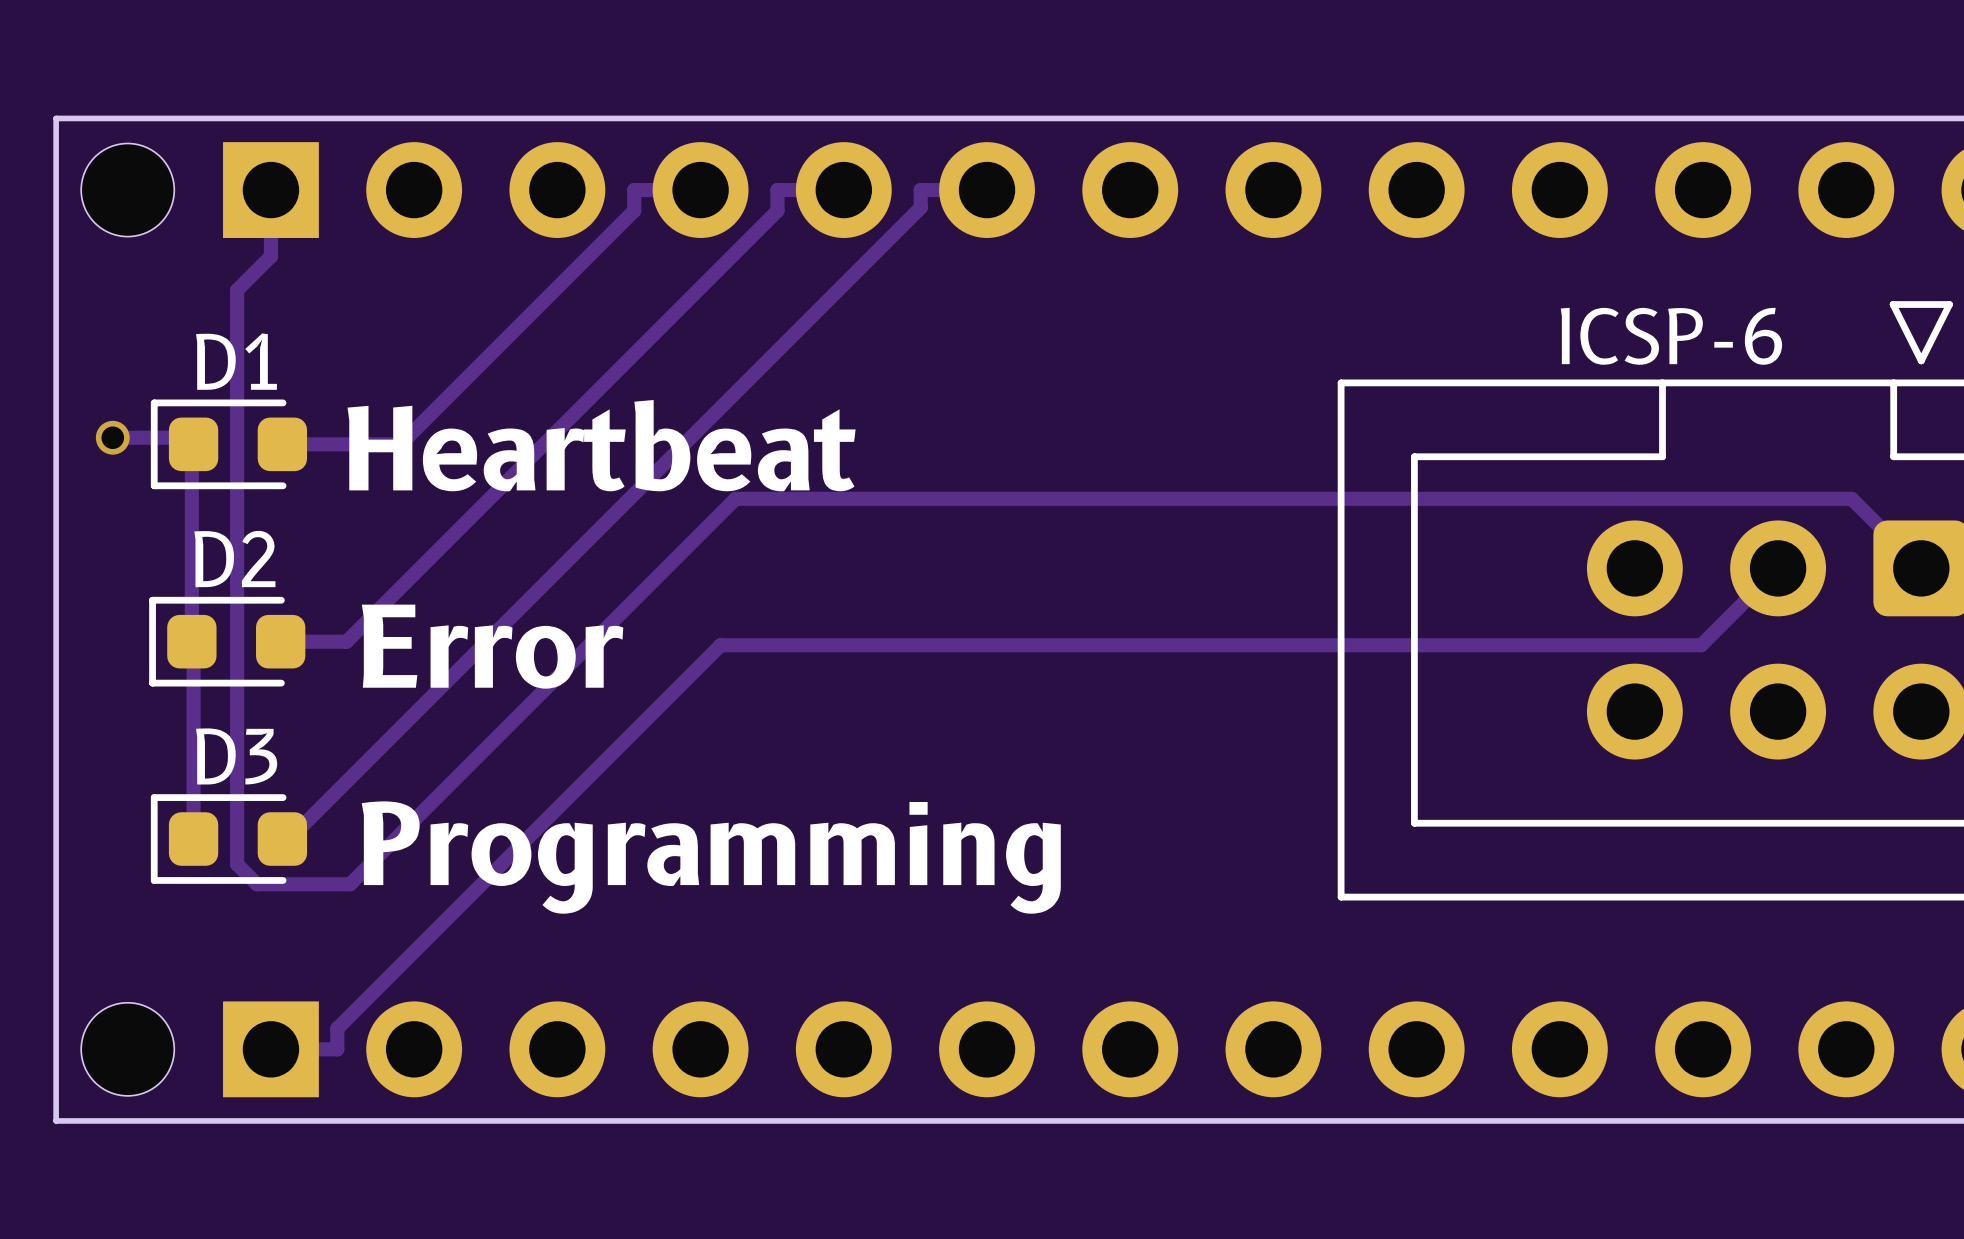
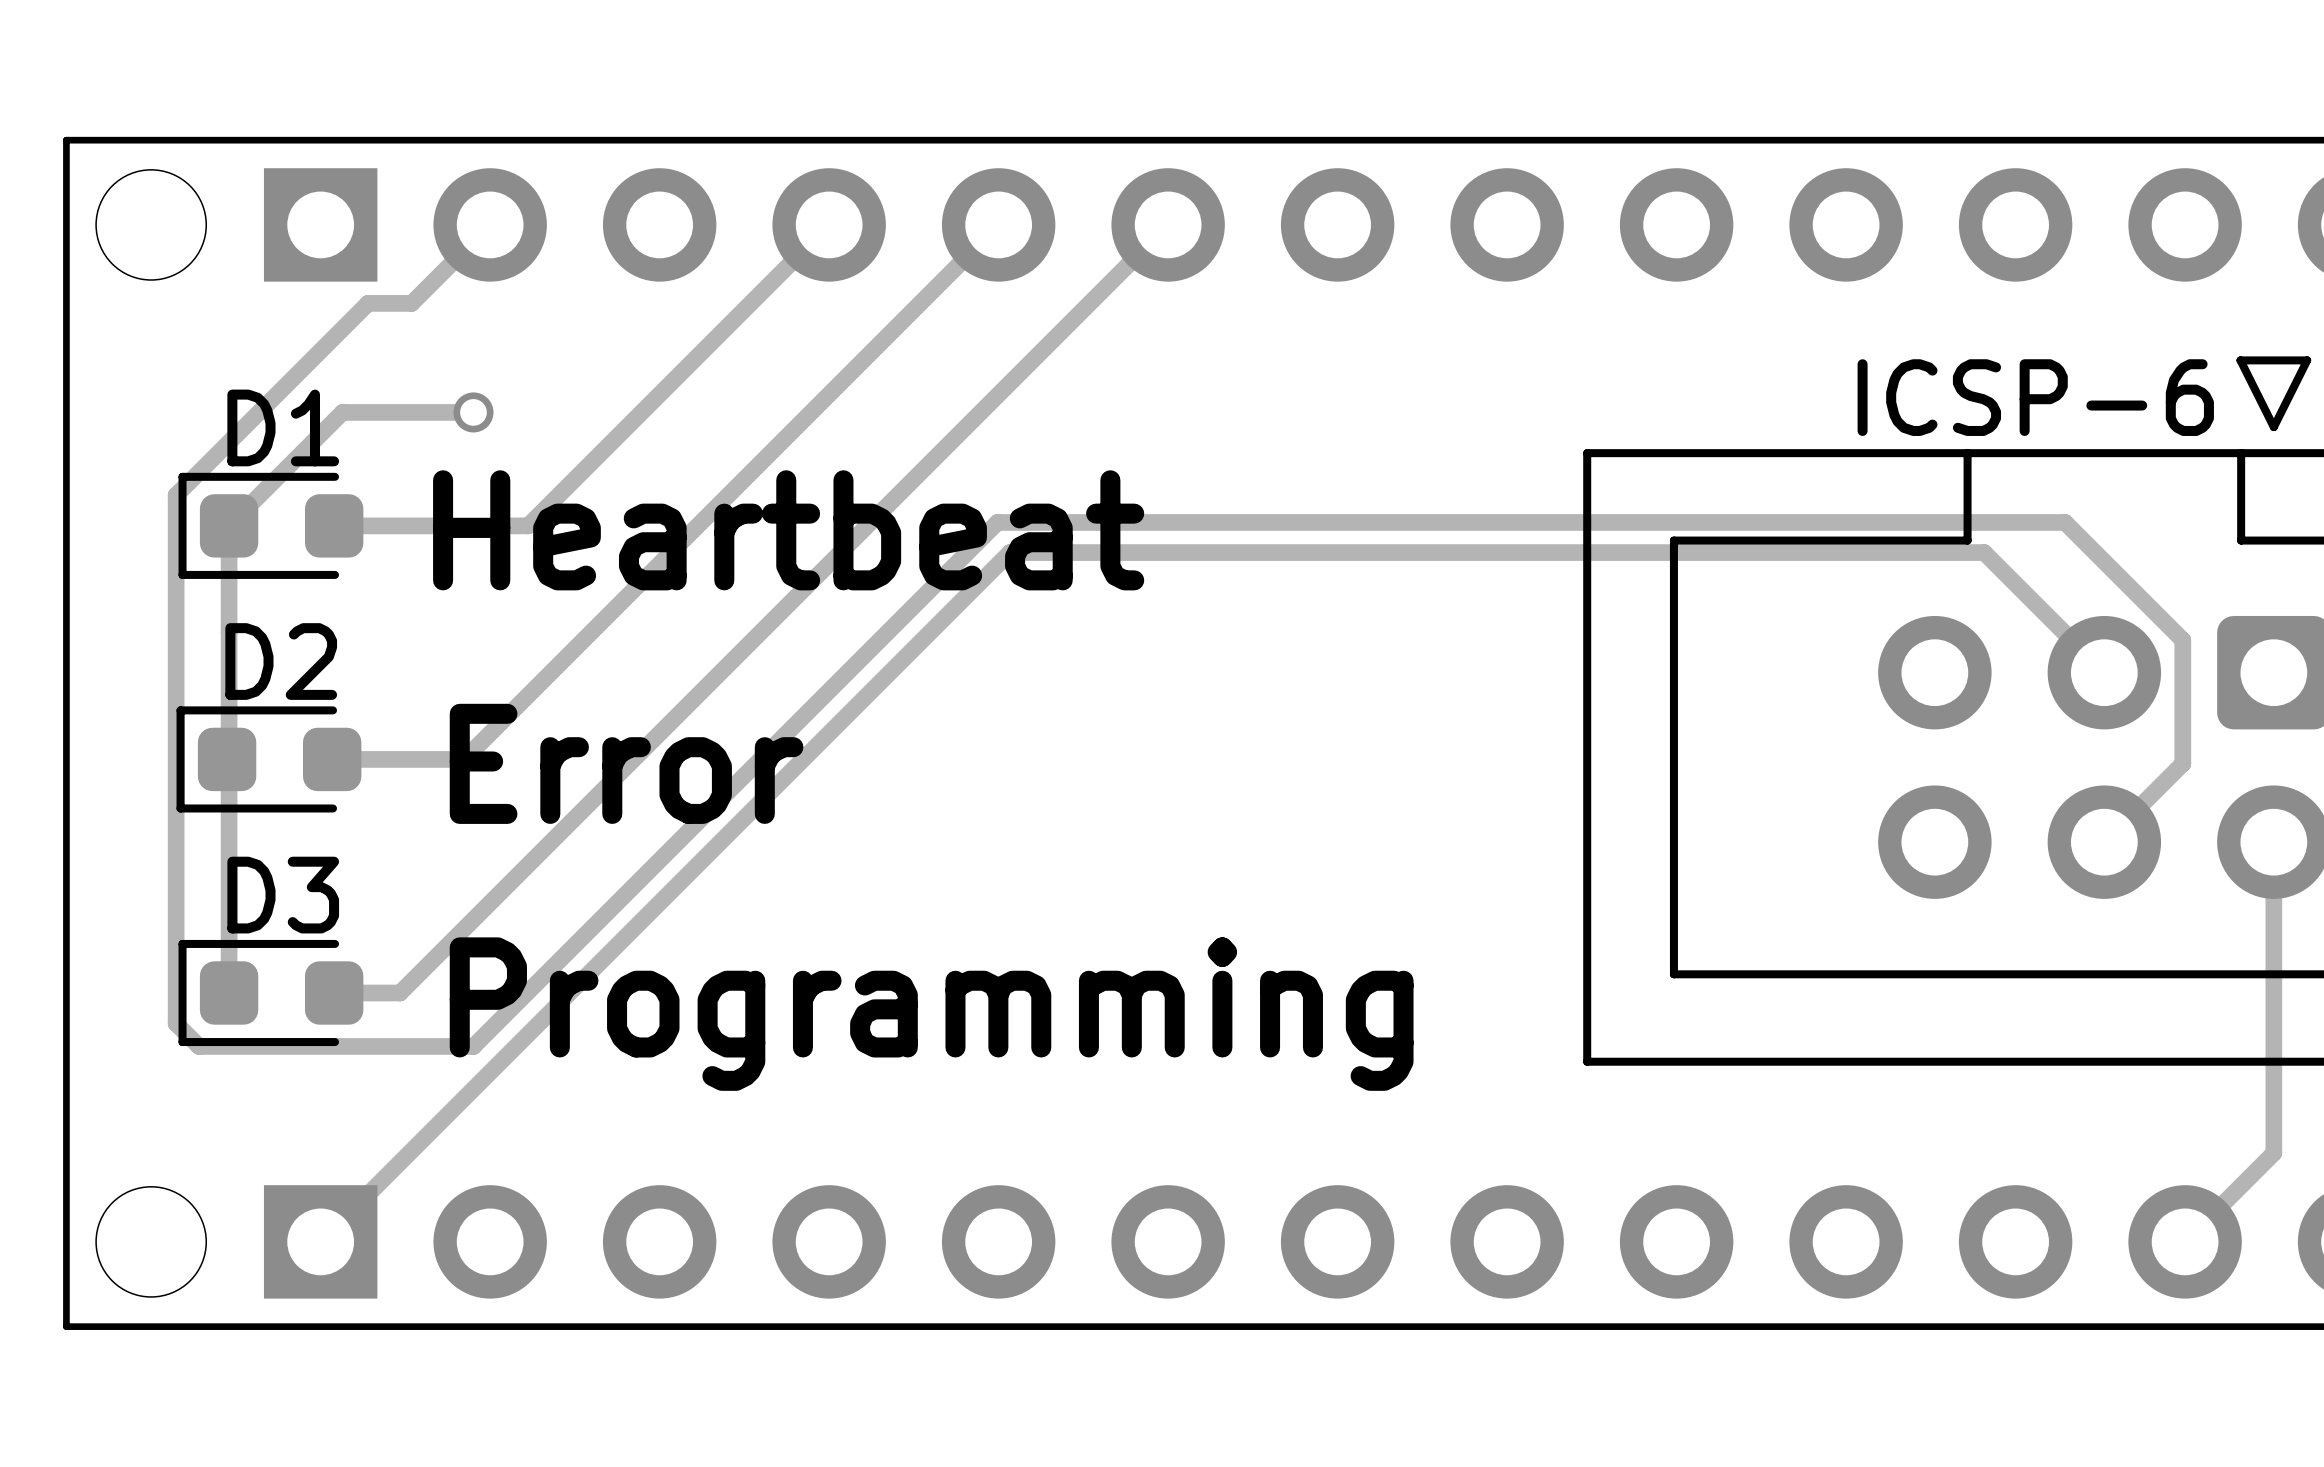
track: (270, 190) (270, 256) (237, 290) (237, 864) (257, 884) -> (490, 224) (411, 303) (368, 303) (176, 495) (176, 1023) (199, 1046) (304, 1046)
track: (700, 190) (634, 190) (634, 210) (400, 444) -> (829, 224) (528, 525) (474, 525)
track: (843, 190) (777, 190) (777, 210) (346, 641) -> (998, 224) (464, 759) (410, 759)
track: (987, 190) (920, 190) (920, 207) (289, 839) -> (1168, 224) (400, 992) (342, 992)
track: (112, 437) (185, 437) (191, 444) (191, 641) (193, 643) -> (473, 412) (342, 412) (229, 525) (229, 761)
via position: (112, 437) -> (473, 412)
track: (1778, 568) (1701, 645) (720, 645) (337, 1028) (337, 1049) (270, 1049) -> (2104, 672) (1984, 552) (1009, 552) (320, 1241)
track: (1921, 568) (1851, 498) (735, 498) (350, 884) -> (2104, 842) (2182, 763) (2182, 640) (2065, 522) (997, 522) (473, 1046) (414, 1046)
track: none -> (2273, 842) (2273, 1153) (2185, 1241)

